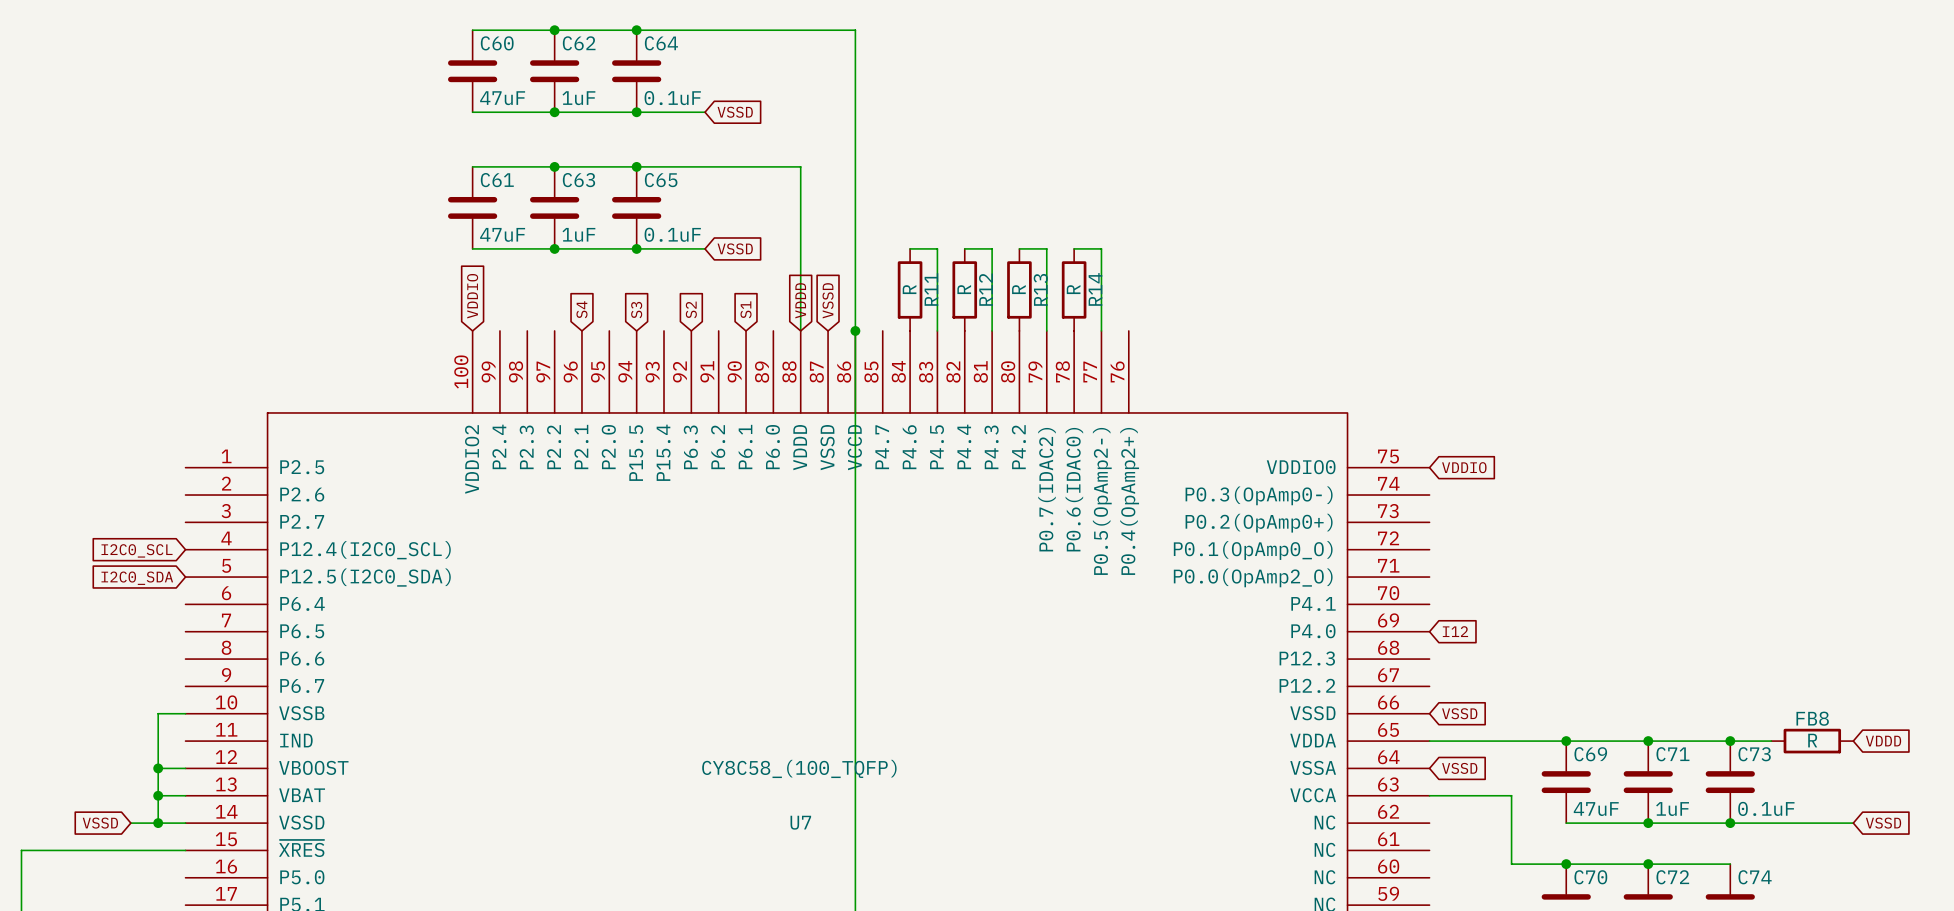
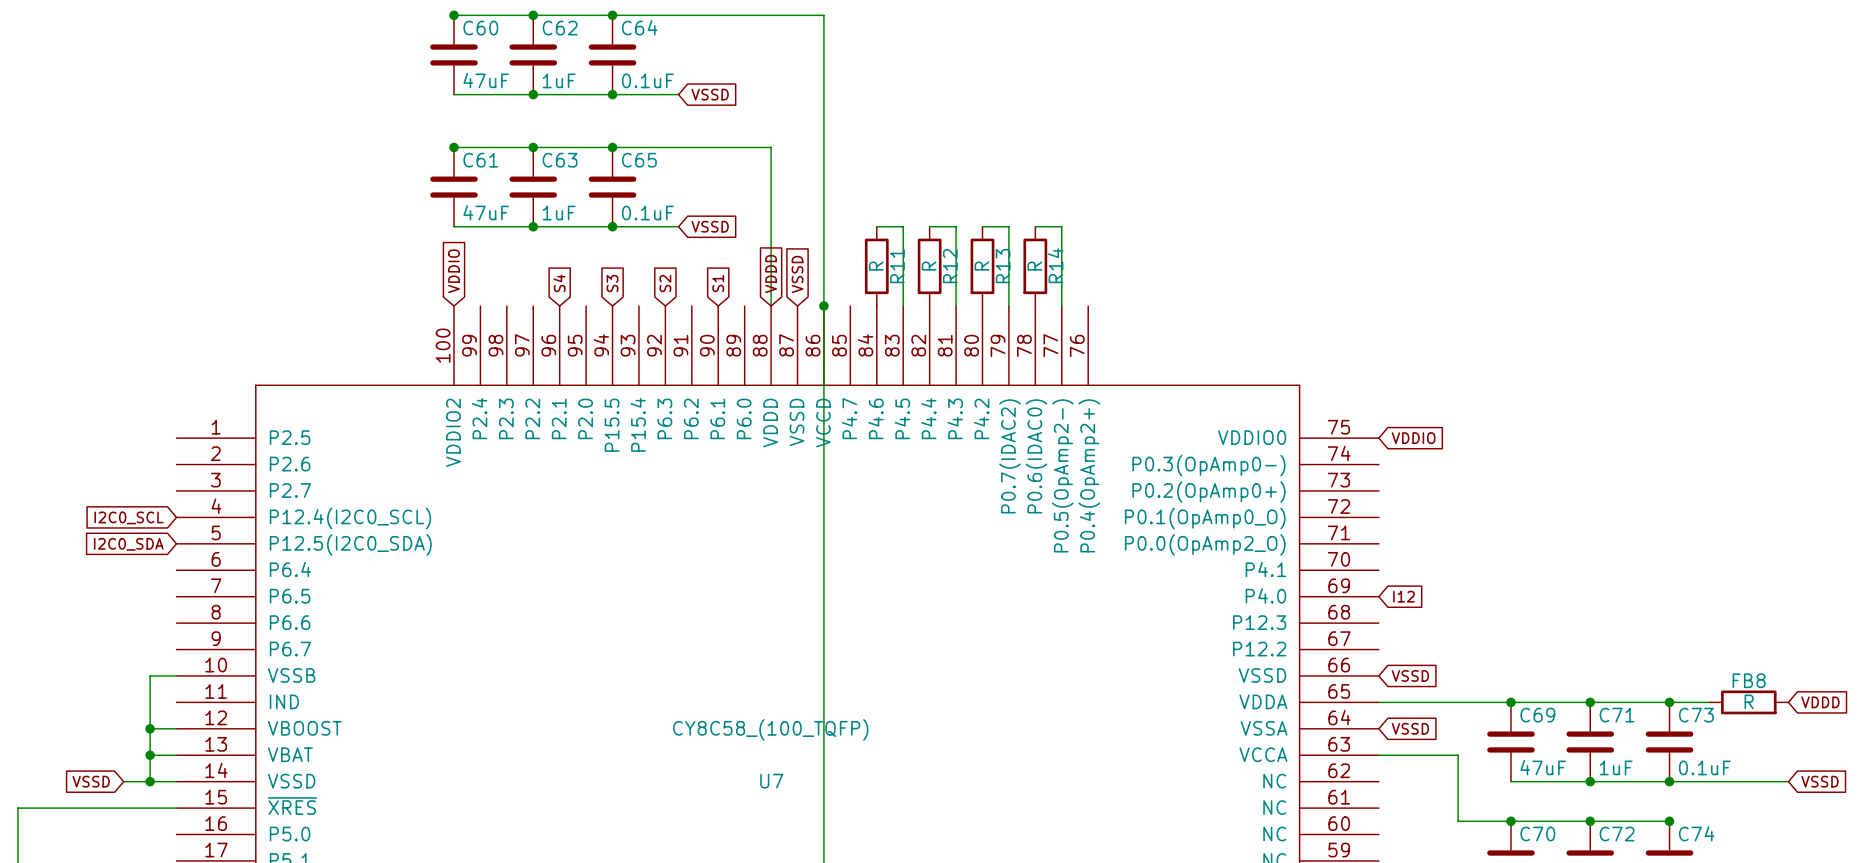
junction: none -> (453, 15)
junction: none -> (453, 147)
junction: none -> (1669, 821)

